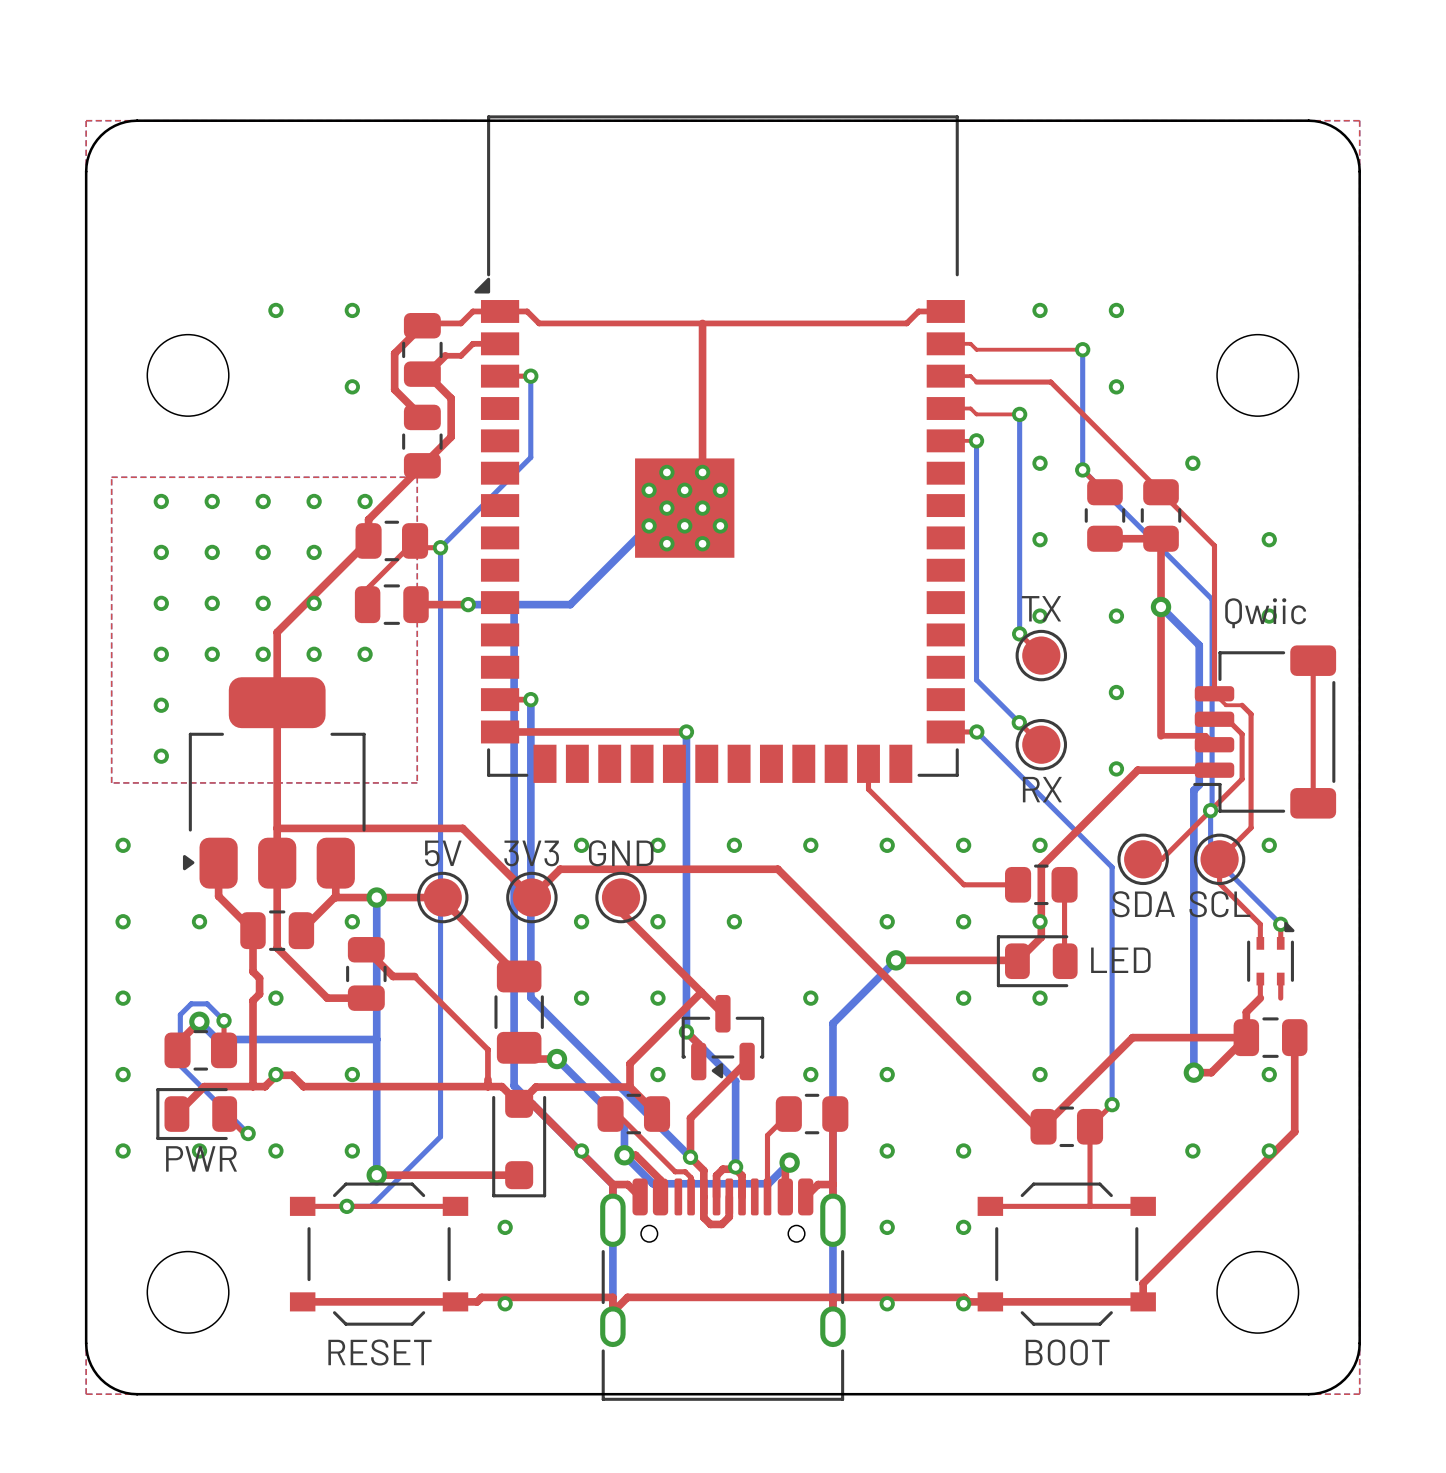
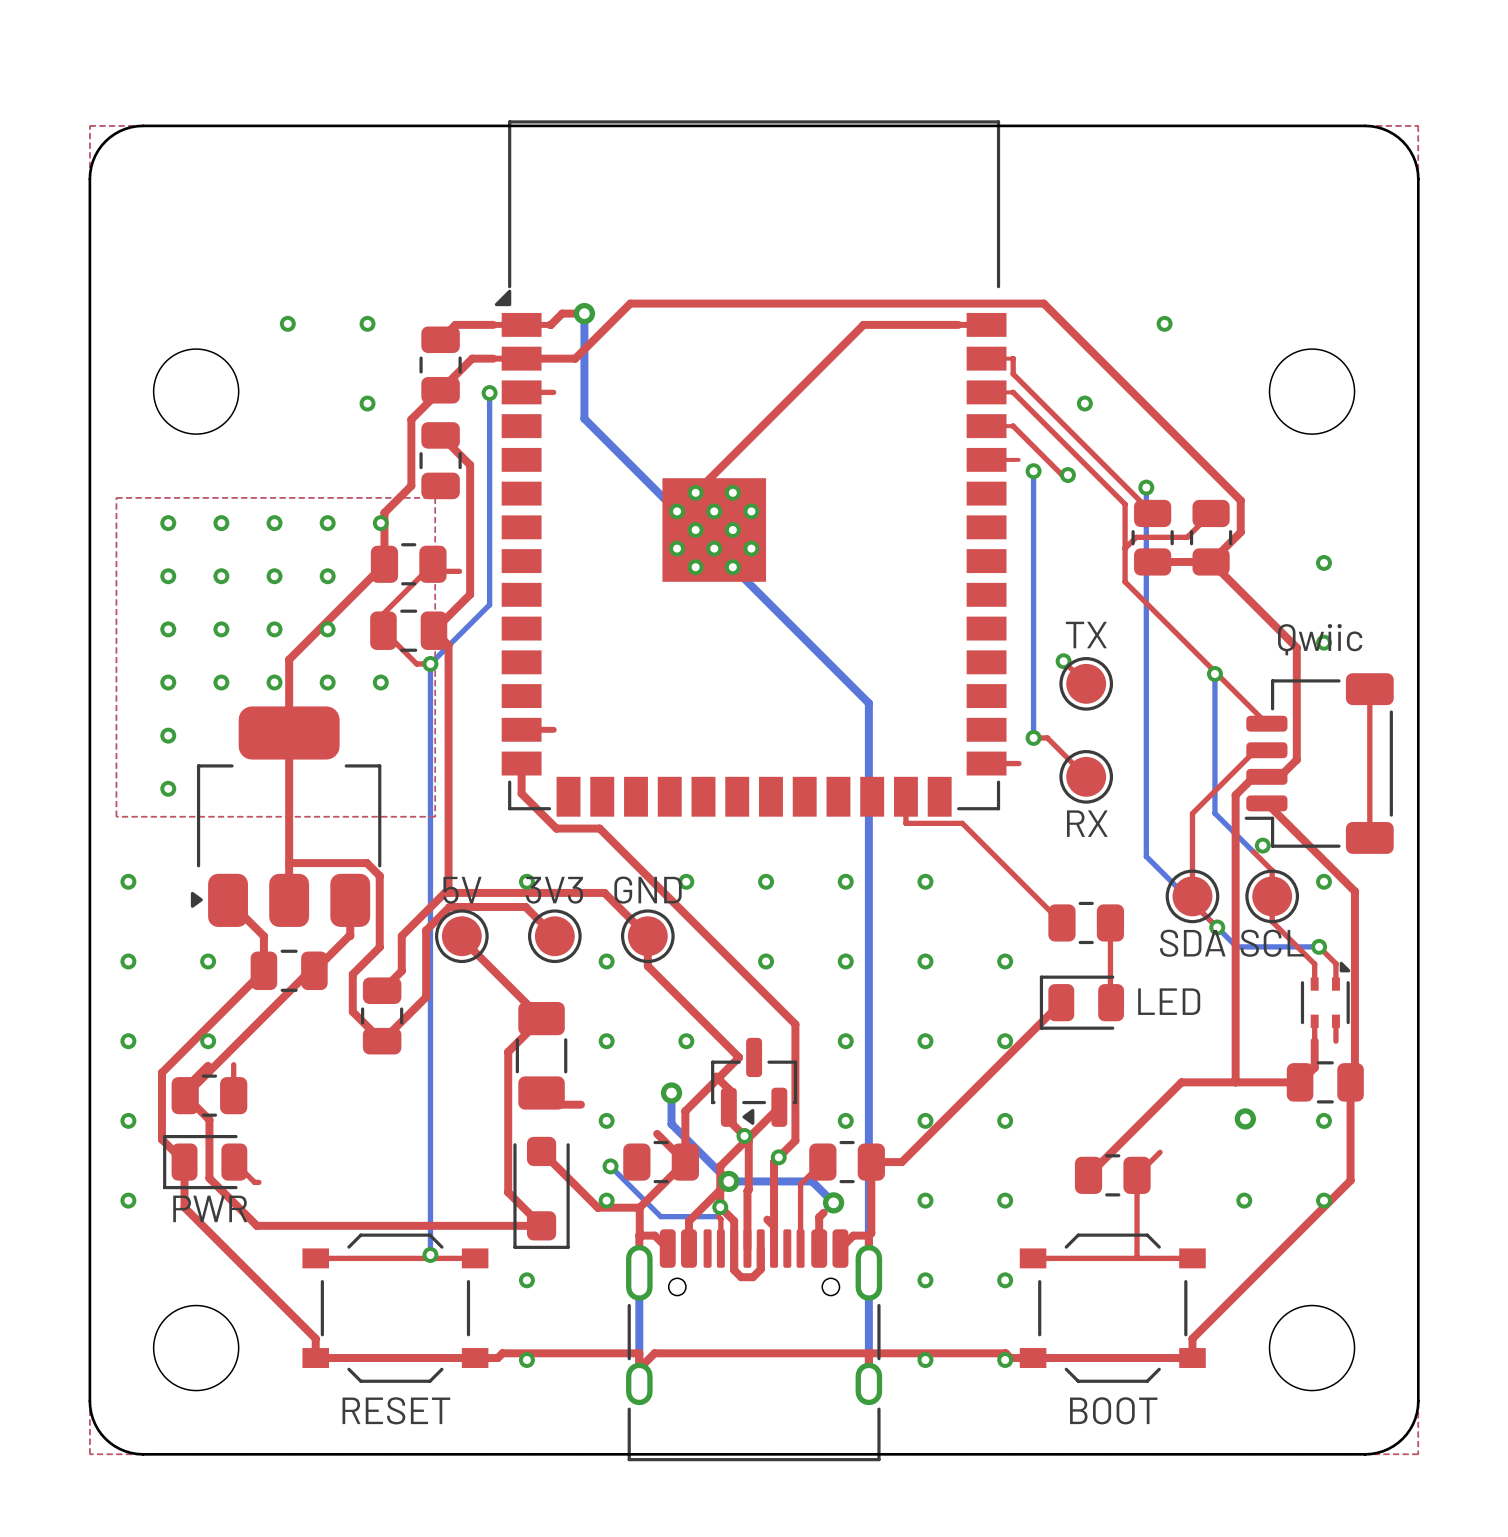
top track: none -> (584, 313) (562, 313) (549, 324)
bottom track: none -> (584, 313) (584, 418) (677, 511)
via: none -> (584, 313)
via: (1040, 310) -> none
top track: (472, 311) (460, 323) (422, 323) (422, 325) (394, 353) (394, 389) (422, 417) -> (493, 324) (455, 324) (440, 339)
top track: (527, 311) (539, 323) (906, 323) (918, 311) -> (695, 492) (863, 324) (958, 324)
top track: (702, 323) (702, 472) (666, 472) (666, 490) -> none
top track: (472, 343) (460, 355) (445, 355) (426, 374) (451, 398) (451, 437) (368, 519) -> (493, 358) (472, 358) (411, 419) (411, 485) (384, 512) (384, 542)
top track: none -> (521, 358) (575, 358) (630, 303) (1043, 303) (1240, 500) (1240, 532) (1211, 561) (1296, 647) (1296, 759) (1279, 776) (1253, 776) (1235, 795) (1235, 1082)
top track: (970, 343) (976, 349) (1082, 349) -> (1012, 358) (1013, 374) (1129, 490)
bottom track: (1082, 349) (1082, 469) (1212, 599) (1210, 854) (1280, 924) -> none
via: (1082, 349) -> none
bottom track: none -> (489, 393) (489, 604) (430, 663) (430, 1254)
bottom track: (530, 376) (530, 457) (440, 547) (440, 1136) (370, 1206) (346, 1206) -> none
via position: (530, 376) -> (489, 393)
top track: (970, 376) (976, 382) (1050, 382) (1214, 545) (1214, 693) (1225, 705) (1242, 705) (1251, 714) (1251, 827) (1219, 859) -> (1012, 392) (1125, 504) (1125, 581) (1266, 723)
via: none -> (1084, 403)
via: (1116, 386) -> none
top track: (970, 408) (976, 414) (1019, 414) -> (1012, 426) (1062, 475) (1067, 475)
bottom track: (1019, 414) (1019, 633) -> none
via: (1019, 414) -> none
top track: none -> (440, 435) (470, 464) (470, 594) (433, 630) (448, 645) (448, 892)
bottom track: (976, 440) (976, 679) (1019, 722) -> none
via position: (976, 440) -> (1033, 471)
bottom track: none -> (1033, 471) (1033, 737)
via position: (1040, 463) -> (1067, 475)
via: (1192, 463) -> none
bottom track: none -> (1146, 487) (1146, 856) (1236, 946) (1319, 946)
via position: (1082, 469) -> (1146, 487)
top track: none -> (1211, 513) (1187, 537) (1136, 537) (1125, 548)
bottom track: (649, 525) (570, 604) (468, 604) -> none
top track: (1161, 538) (1161, 735) (1205, 735) (1214, 744) -> none
via: (1040, 539) -> none
via: (440, 547) -> none
top track: none -> (383, 630) (416, 663) (430, 663)
top track: (416, 604) (468, 604) -> none
via: (468, 604) -> none
bottom track: (514, 604) (514, 1085) (612, 1184) (612, 1220) -> none
bottom track: (1161, 607) (1199, 645) (1199, 785) (1193, 790) (1193, 1072) -> none
via: (1161, 607) -> none
via: (1040, 616) -> none
via: (1116, 616) -> none
via: none -> (430, 663)
bottom track: none -> (1214, 673) (1214, 813) (1253, 851)
via: none -> (1214, 673)
via: (1116, 692) -> none
bottom track: (530, 699) (530, 997) (690, 1157) -> none
via: (530, 699) -> none
top track: none -> (1033, 737) (1047, 737) (1063, 753)
via: none -> (1033, 737)
top track: (1214, 719) (1227, 719) (1242, 734) (1242, 779) (1161, 859) (1143, 859) -> (1266, 750) (1255, 750) (1192, 813) (1192, 902) (1217, 927)
via: (1019, 722) -> none
top track: (500, 731) (686, 731) -> (521, 763) (521, 793) (556, 828) (599, 828) (795, 1024) (795, 1140) (774, 1162) (774, 1226)
bottom track: (686, 731) (686, 1031) (735, 1081) (735, 1166) -> none
via: (686, 731) -> none
bottom track: (976, 731) (1112, 867) (1112, 1104) -> none
via: (976, 731) -> none
via: (1116, 768) -> none
top track: (1214, 770) (1137, 770) (1041, 866) (1041, 937) (1017, 961) (896, 960) -> (1266, 803) (1354, 891) (1354, 1077) (1350, 1082)
top track: (868, 789) (963, 884) (1018, 884) -> (905, 823) (962, 823) (1061, 922)
top track: none -> (1253, 851) (1272, 870) (1272, 896)
top track: (277, 828) (462, 828) (503, 869) -> (289, 863) (366, 863) (379, 875) (379, 947) (352, 974) (352, 1011) (382, 1041) (426, 997) (426, 930) (449, 906) (525, 906)
via: none -> (526, 881)
via: (581, 845) -> none
via: (963, 845) -> none
via: (1040, 845) -> none
top track: (218, 863) (218, 896) (253, 930) (253, 971) (259, 978) (259, 994) (253, 1000) (253, 1086) -> (228, 900) (263, 936) (263, 970) (161, 1072) (161, 1139) (184, 1162) (184, 1207) (315, 1338) (315, 1358)
top track: (277, 863) (277, 948) (327, 998) (366, 998) -> none
via: none -> (1217, 927)
top track: (335, 897) (442, 897) -> none
bottom track: (376, 897) (376, 1175) -> none
via: (376, 897) -> none
top track: (531, 897) (560, 869) (777, 869) (1035, 1126) (1043, 1126) -> none
top track: none -> (1319, 946) (1335, 963)
top track: (621, 911) (722, 1013) -> (647, 951) (647, 966) (739, 1057) (685, 1111) (685, 1162) (639, 1207)
via: (352, 921) -> none
via: (657, 921) -> none
via: none -> (845, 961)
via: (1040, 921) -> none
via position: (1280, 924) -> (1319, 946)
top track: none -> (314, 970) (310, 970) (185, 1095) (209, 1119) (209, 1178) (256, 1225) (392, 1225)
top track: (366, 949) (393, 976) (414, 976) (487, 1049) (487, 1086) -> (382, 990) (401, 971) (401, 936) (444, 892) (604, 892) (647, 936)
bottom track: (896, 960) (832, 1023) -> (732, 567) (868, 703) (868, 1067)
via: (896, 960) -> none
top track: none -> (541, 1018) (508, 1051) (508, 1192) (541, 1225)
top track: (701, 992) (630, 1063) (630, 1087) (536, 1087) (519, 1103) -> none
via: (275, 998) -> none
via: none -> (925, 1041)
via: (1040, 998) -> none
top track: (1260, 998) (1246, 1012) (1246, 1037) (1211, 1072) (1193, 1072) -> (1314, 1041) (1314, 1067) (1300, 1082)
bottom track: (224, 1020) (207, 1003) (191, 1003) (180, 1014) (180, 1065) (248, 1133) -> none
via position: (224, 1020) -> (208, 1041)
bottom track: (199, 1021) (217, 1039) (376, 1039) -> none
via: (199, 1021) -> none
via: (686, 1031) -> none
bottom track: none -> (671, 1092) (671, 1124) (728, 1181) (812, 1181) (833, 1202)
via: none -> (671, 1092)
bottom track: (556, 1059) (624, 1126) (624, 1155) (652, 1183) (768, 1183) (789, 1162) -> none
via: (556, 1059) -> none
via: (275, 1074) -> none
via: (352, 1074) -> none
via: none -> (606, 1120)
via: (657, 1074) -> none
via: none -> (1005, 1120)
via: (1040, 1074) -> none
via: none -> (744, 1135)
top track: (519, 1103) (532, 1103) (612, 1184) -> (541, 1151) (597, 1207) (639, 1207)
top track: (519, 1103) (501, 1086) (303, 1086) (292, 1075) (276, 1075) (265, 1086) (204, 1086) (176, 1114) -> none
via: (1112, 1104) -> none
via: none -> (778, 1157)
top track: (610, 1114) (617, 1114) (675, 1171) (685, 1171) (691, 1177) -> (718, 1216) (720, 1219) (720, 1228)
top track: (835, 1114) (832, 1116) (832, 1184) -> (1061, 1002) (901, 1162) (871, 1162) (871, 1233) (868, 1235)
bottom track: none -> (610, 1166) (660, 1216) (718, 1216)
via: none -> (610, 1166)
via: none -> (728, 1181)
via: (248, 1133) -> none
via: (199, 1150) -> none
via: (275, 1150) -> none
via: (352, 1150) -> none
top track: (624, 1155) (635, 1155) (660, 1180) -> (728, 1181) (689, 1221) (689, 1230)
via: (624, 1155) -> none
top track: none -> (639, 1207) (639, 1235)
via position: (789, 1162) -> (833, 1202)
top track: (735, 1166) (735, 1169) (722, 1169) (716, 1175) -> (728, 1107) (728, 1120) (748, 1140) (747, 1226)
via: (735, 1166) -> none
via: (376, 1175) -> none
via: none -> (430, 1254)
via: (346, 1206) -> none

